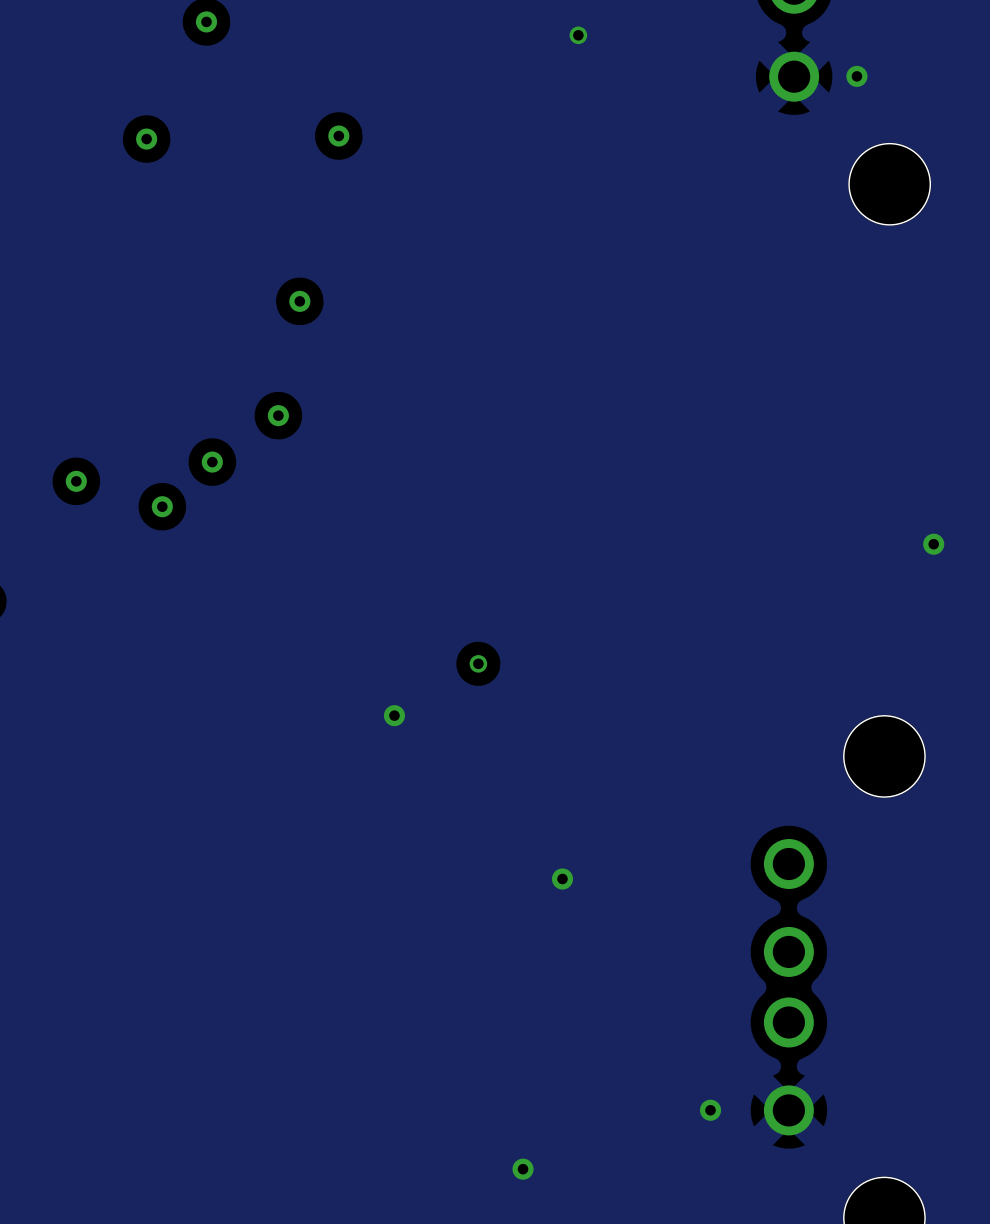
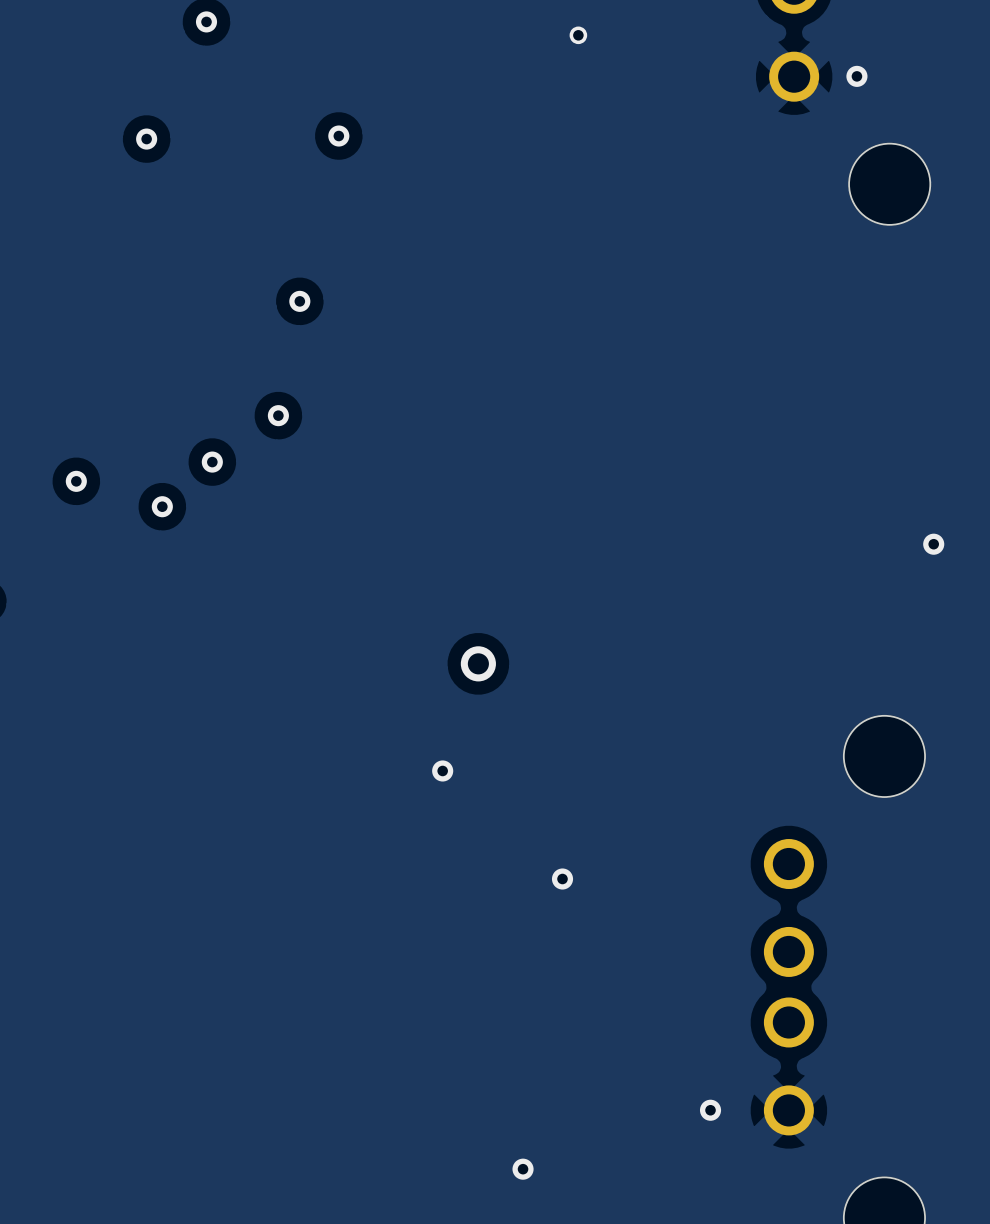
via size: [469, 655, 488, 673] -> [460, 646, 496, 682]
via position: (394, 715) -> (442, 770)

